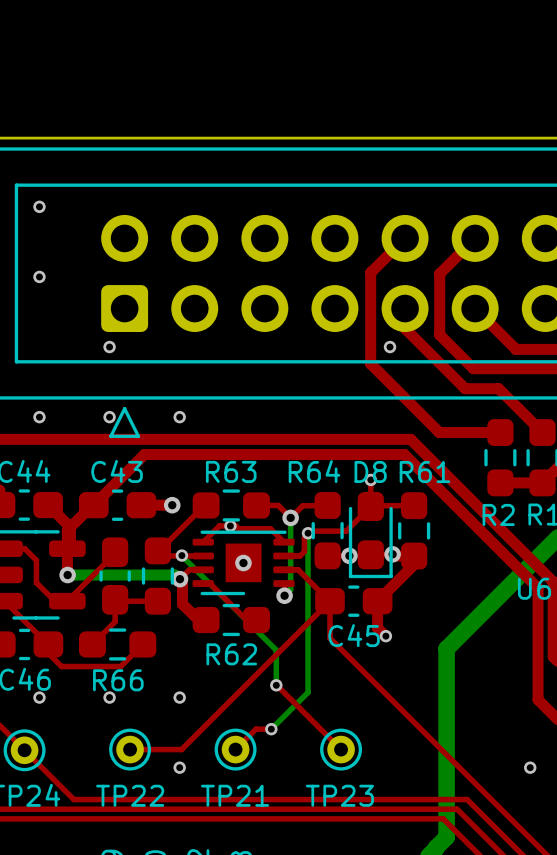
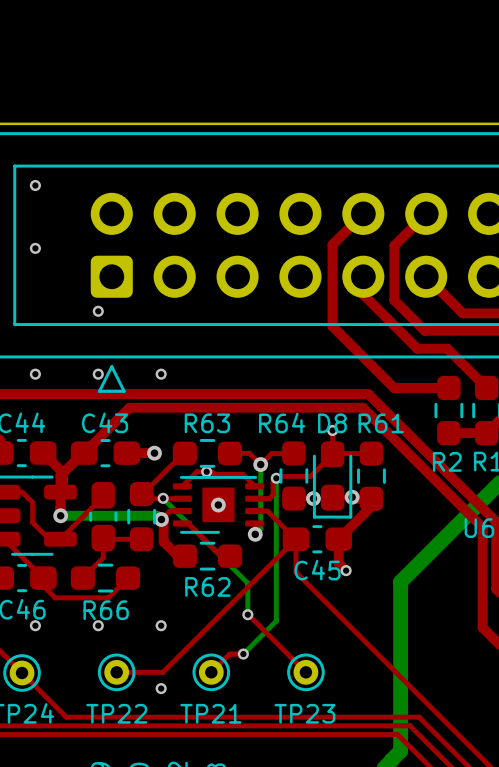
via: (390, 347) -> none
via: (530, 767) -> none

